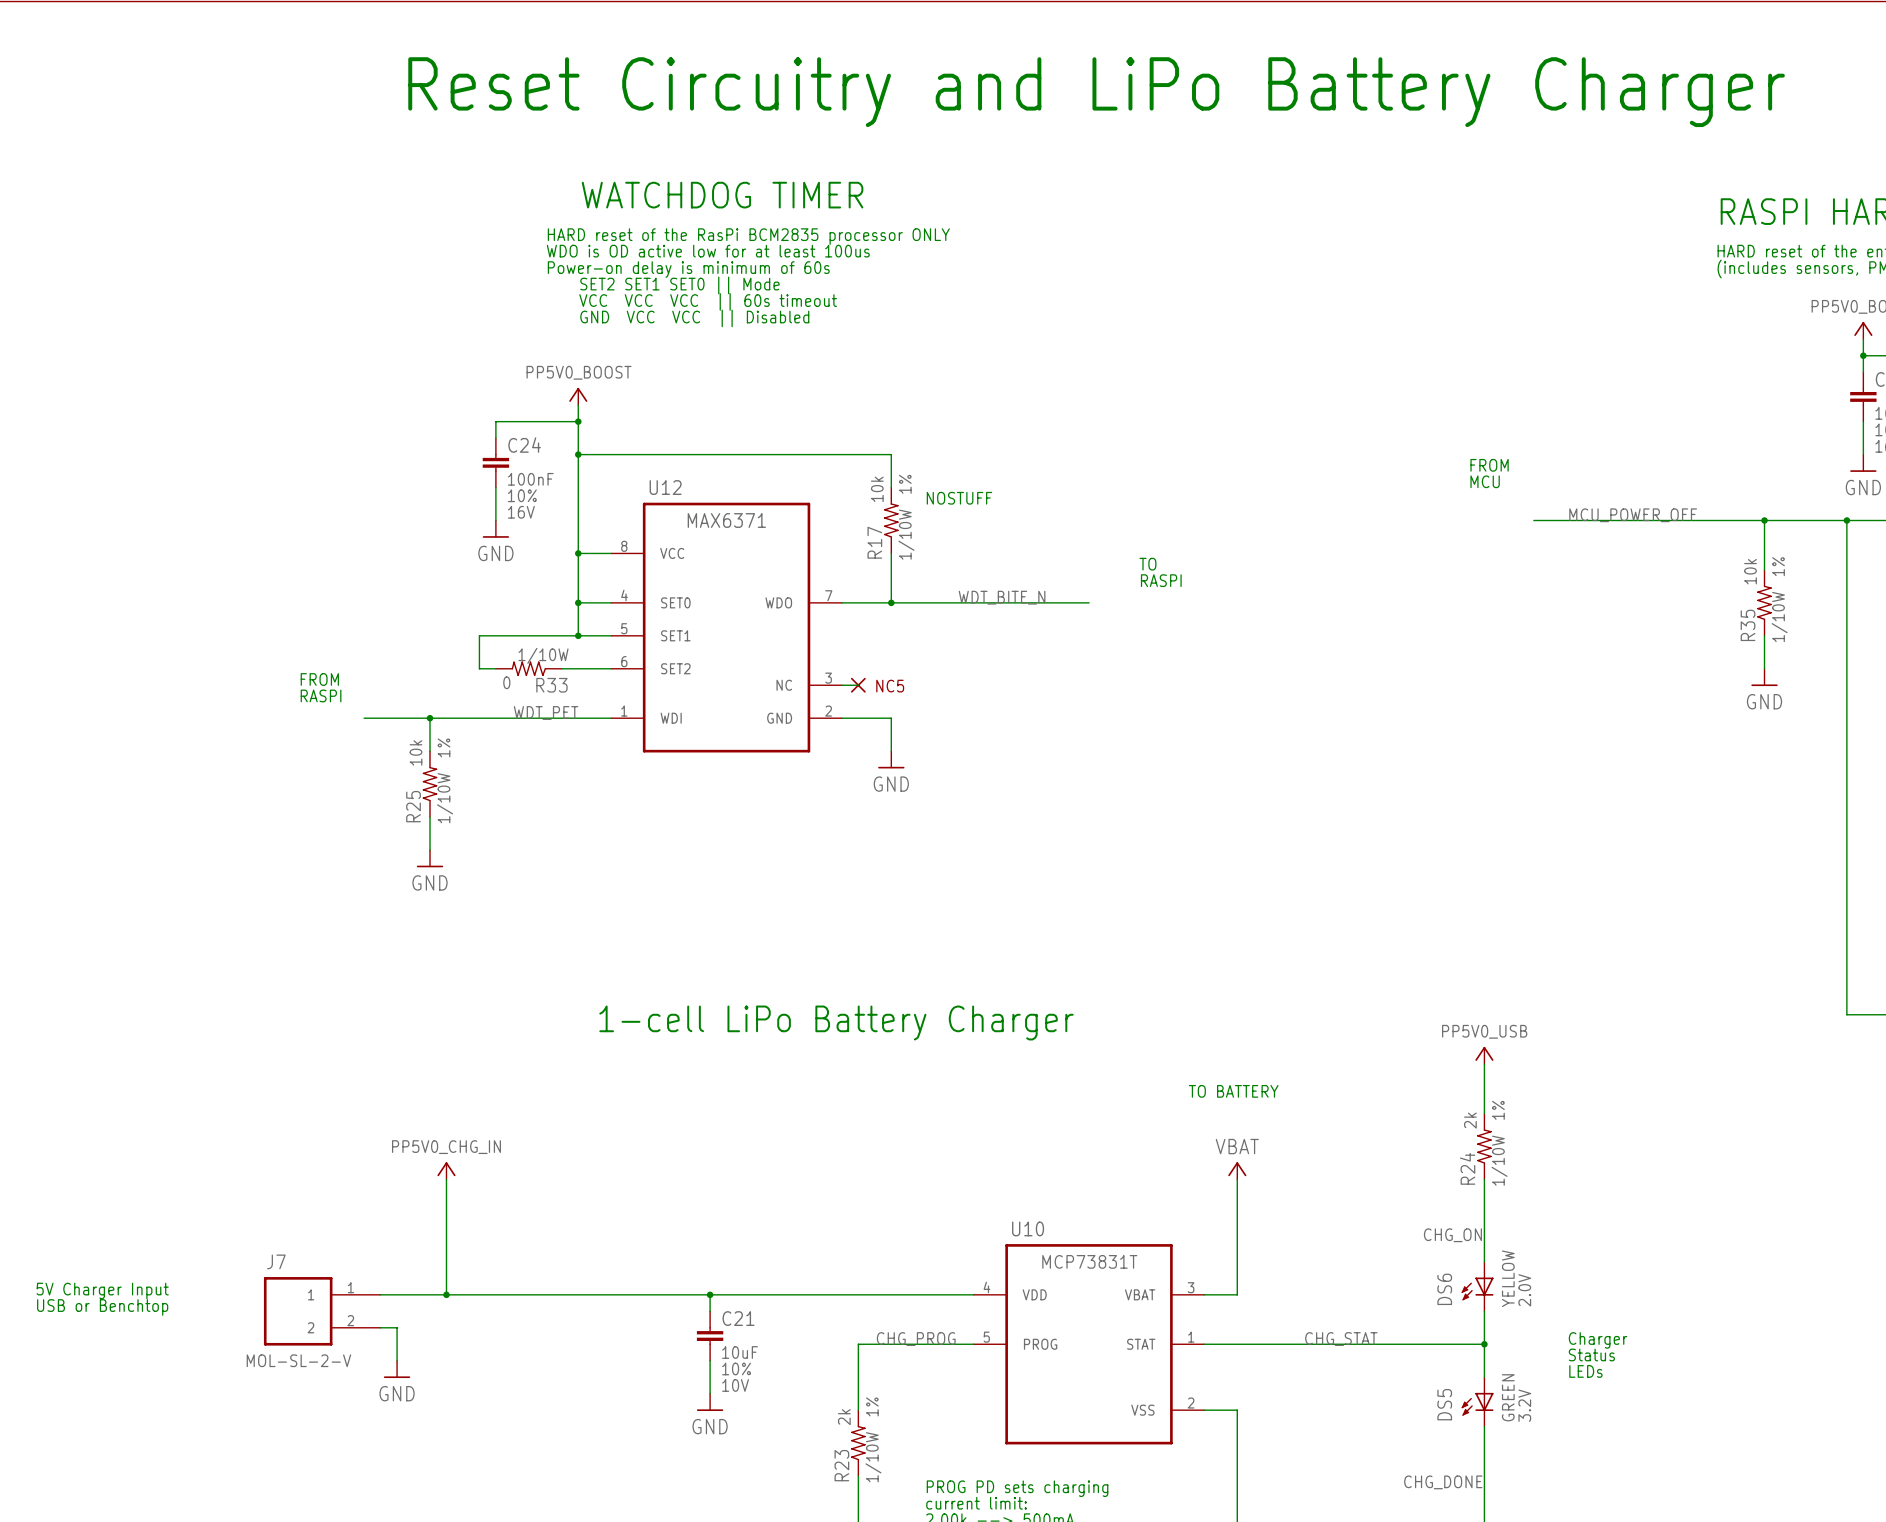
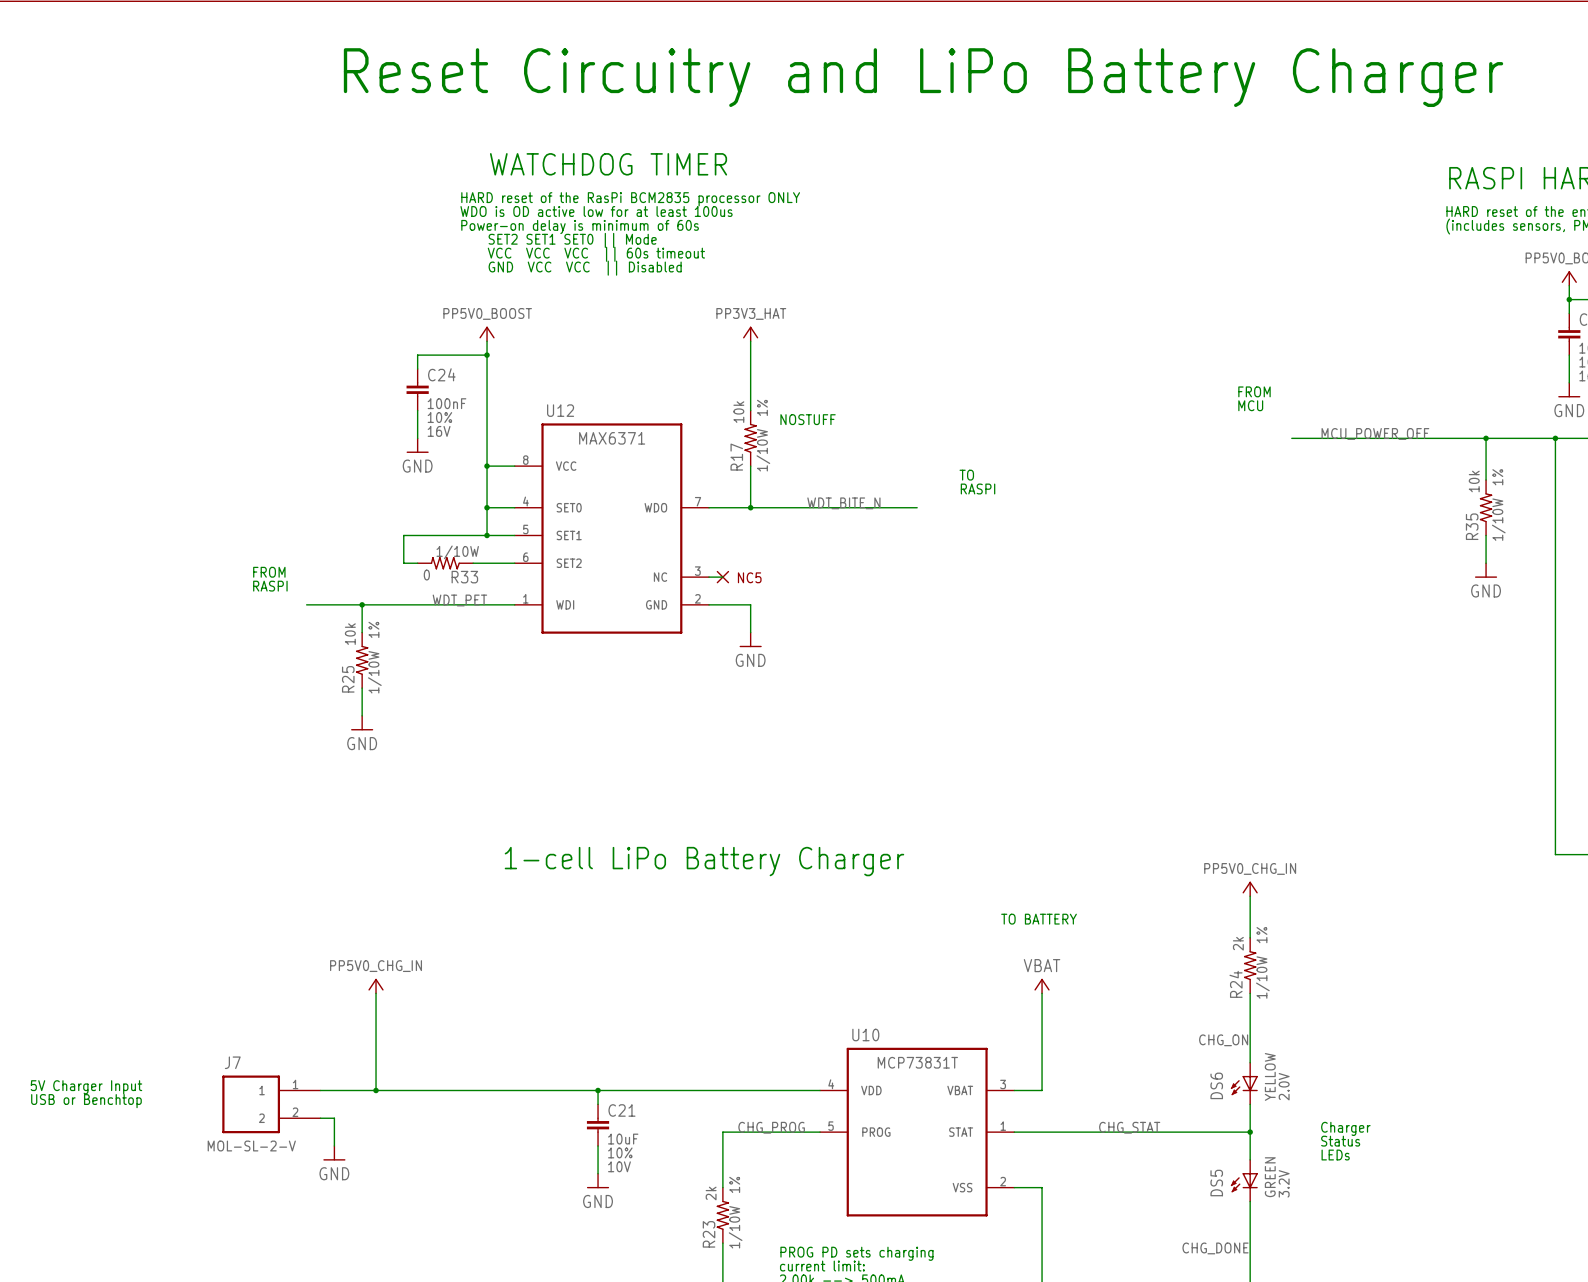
power symbol: none -> PP3V3_HAT (750, 333)
wire: (578, 454) (891, 454) -> (750, 341) (750, 382)
junction: (578, 454) -> none
power symbol: PP5V0_USB (1484, 1055) -> PP5V0_CHG_IN (1250, 888)

